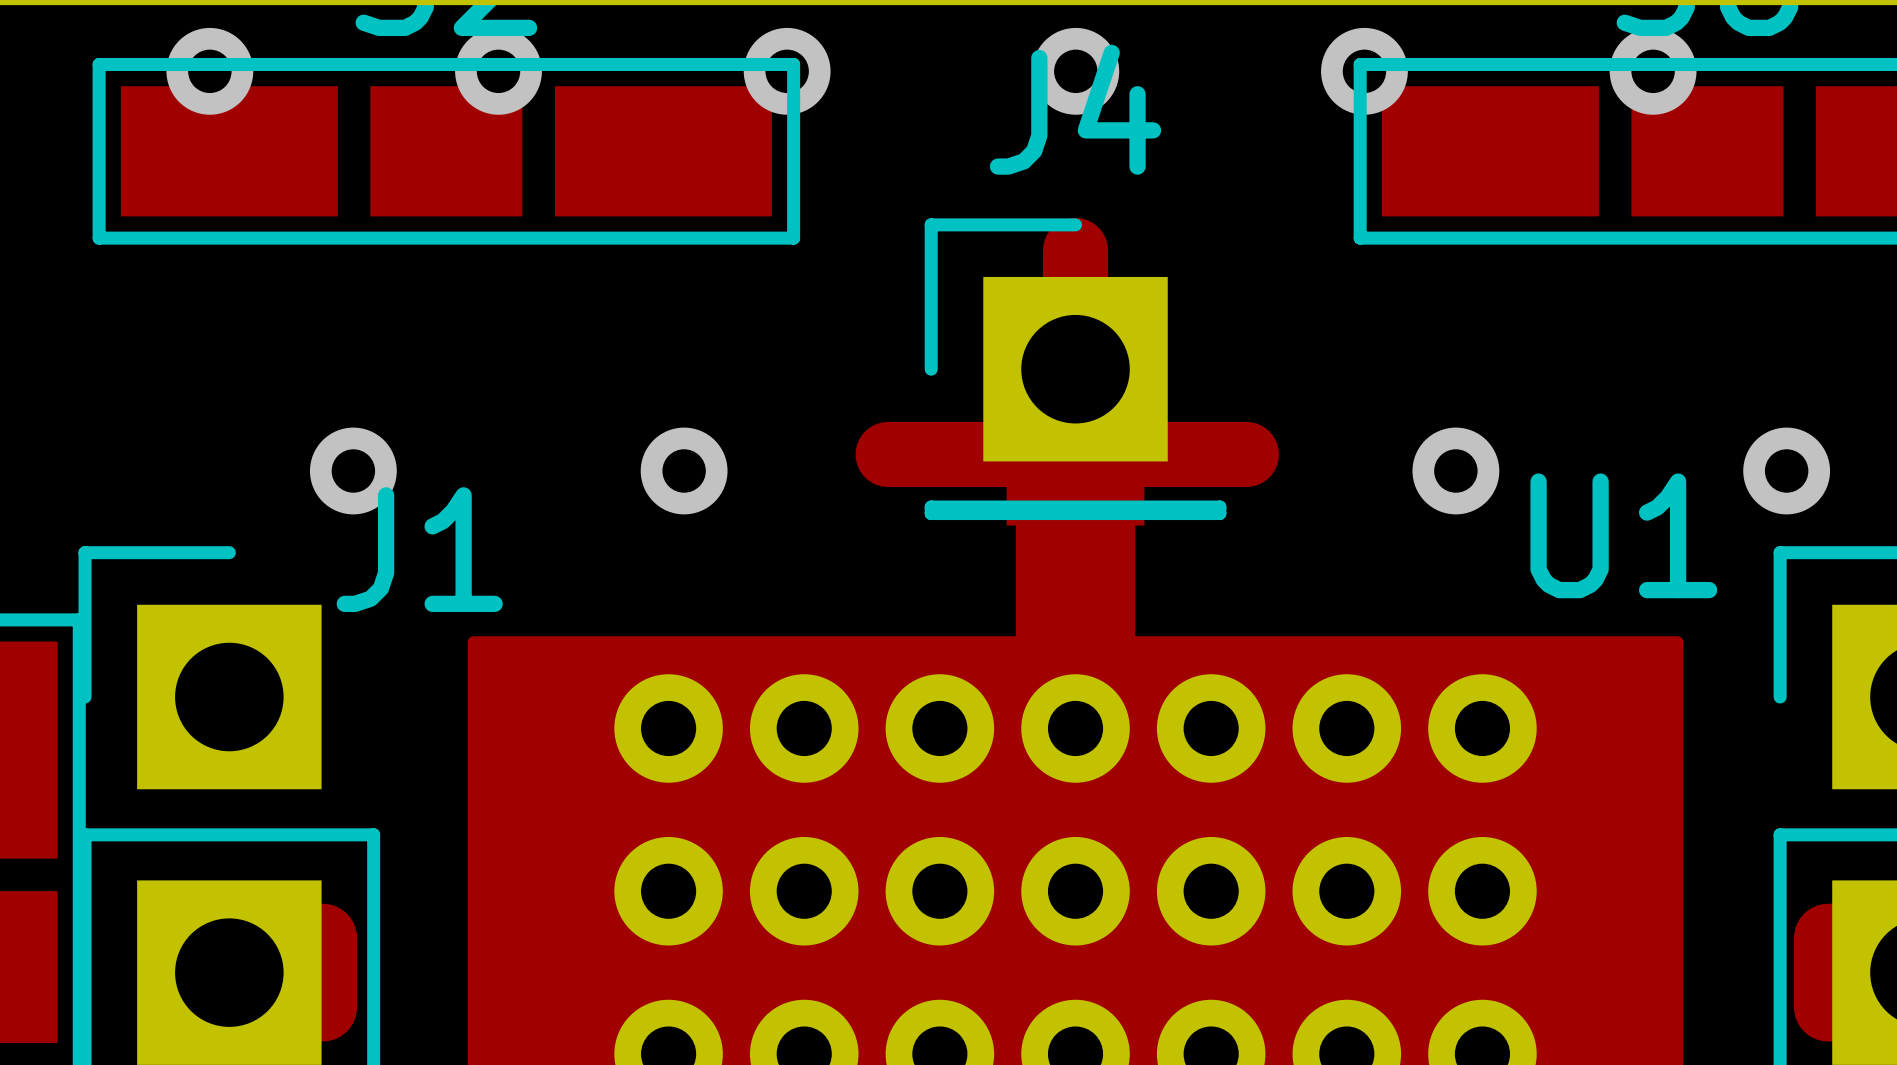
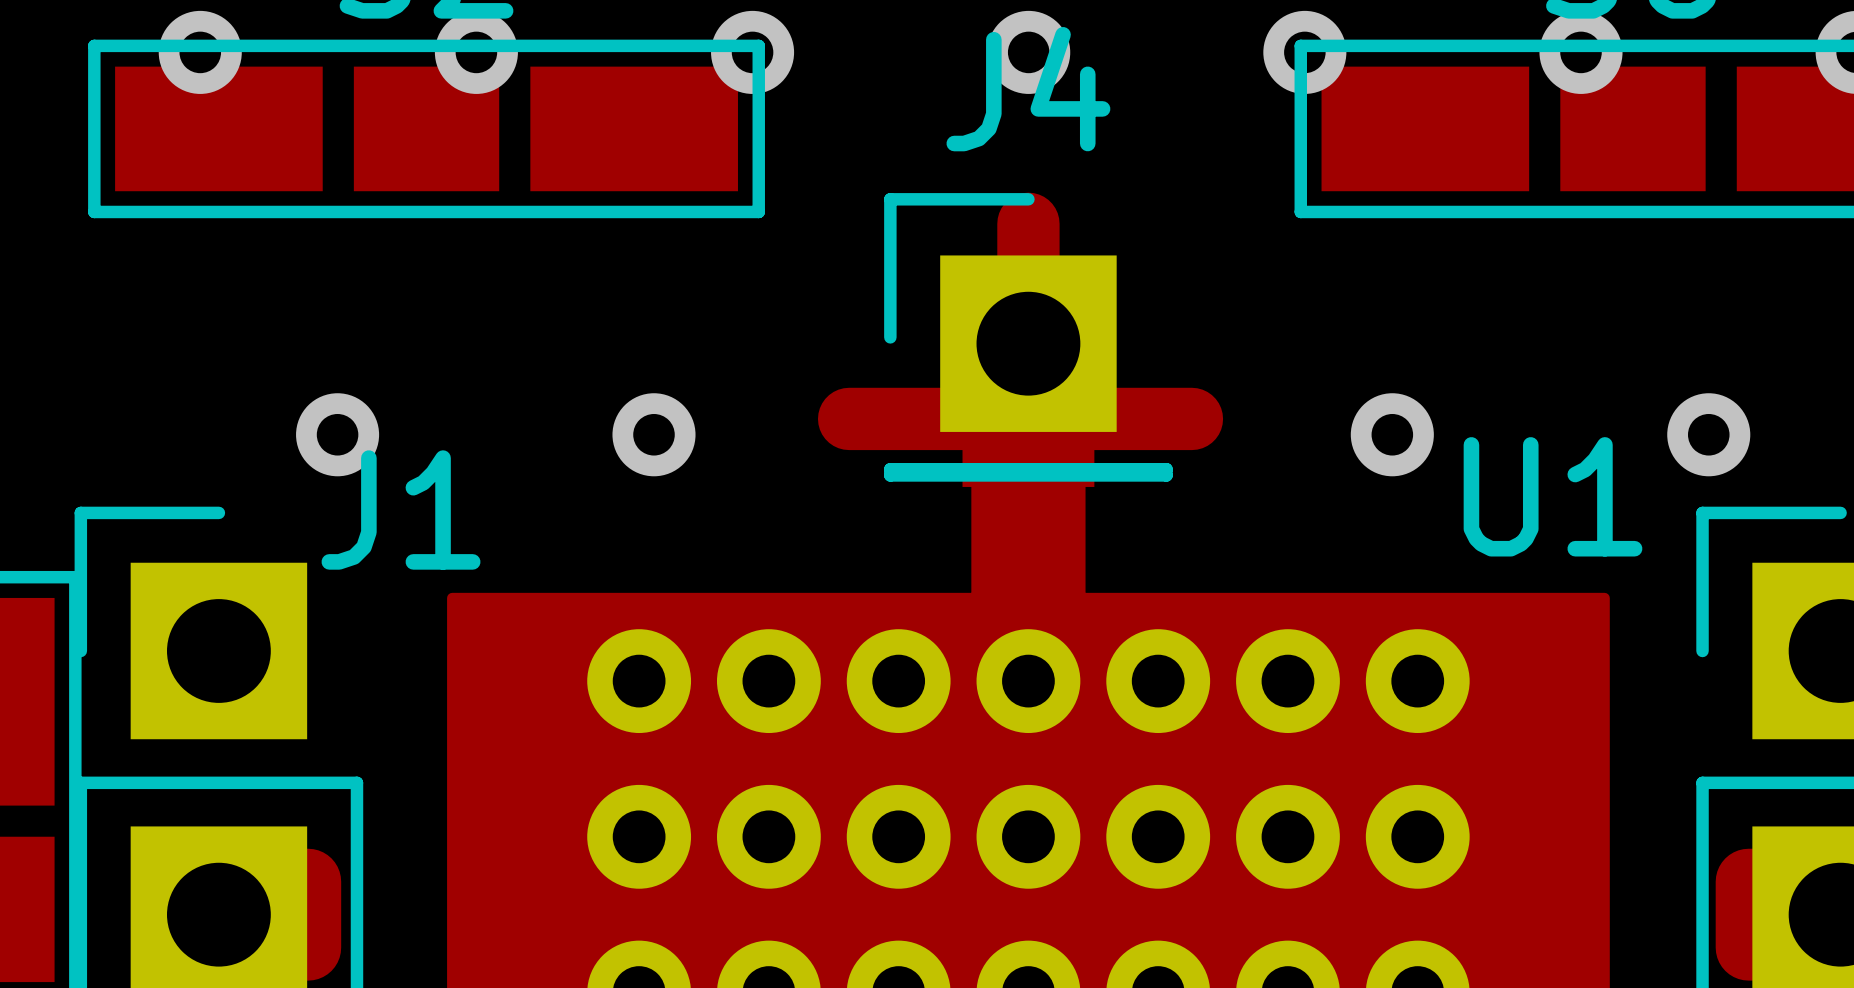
J4 footprint: [924, 218, 1227, 521] -> [884, 193, 1173, 482]

